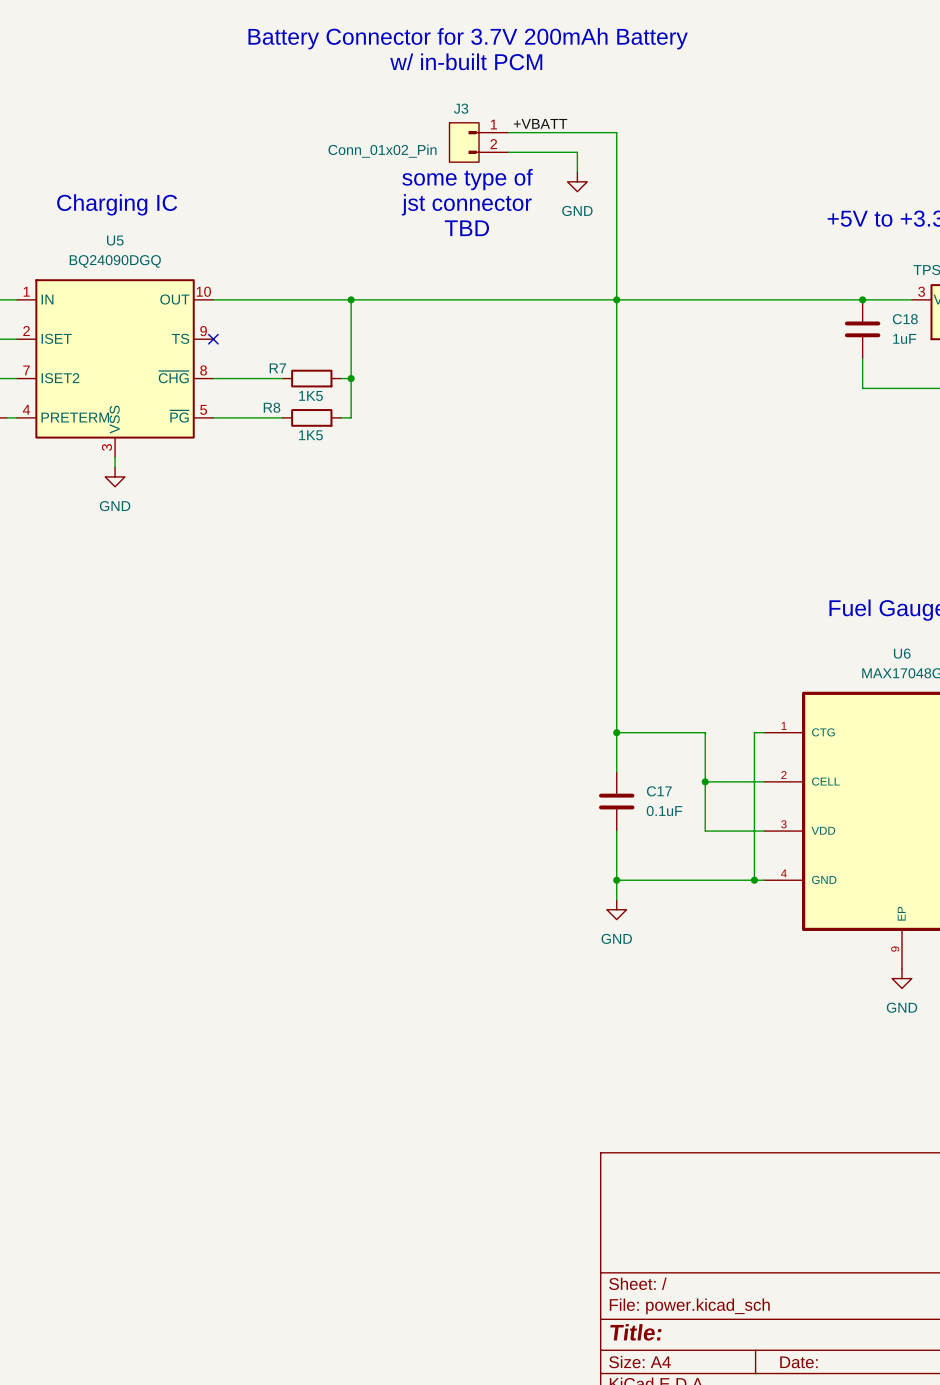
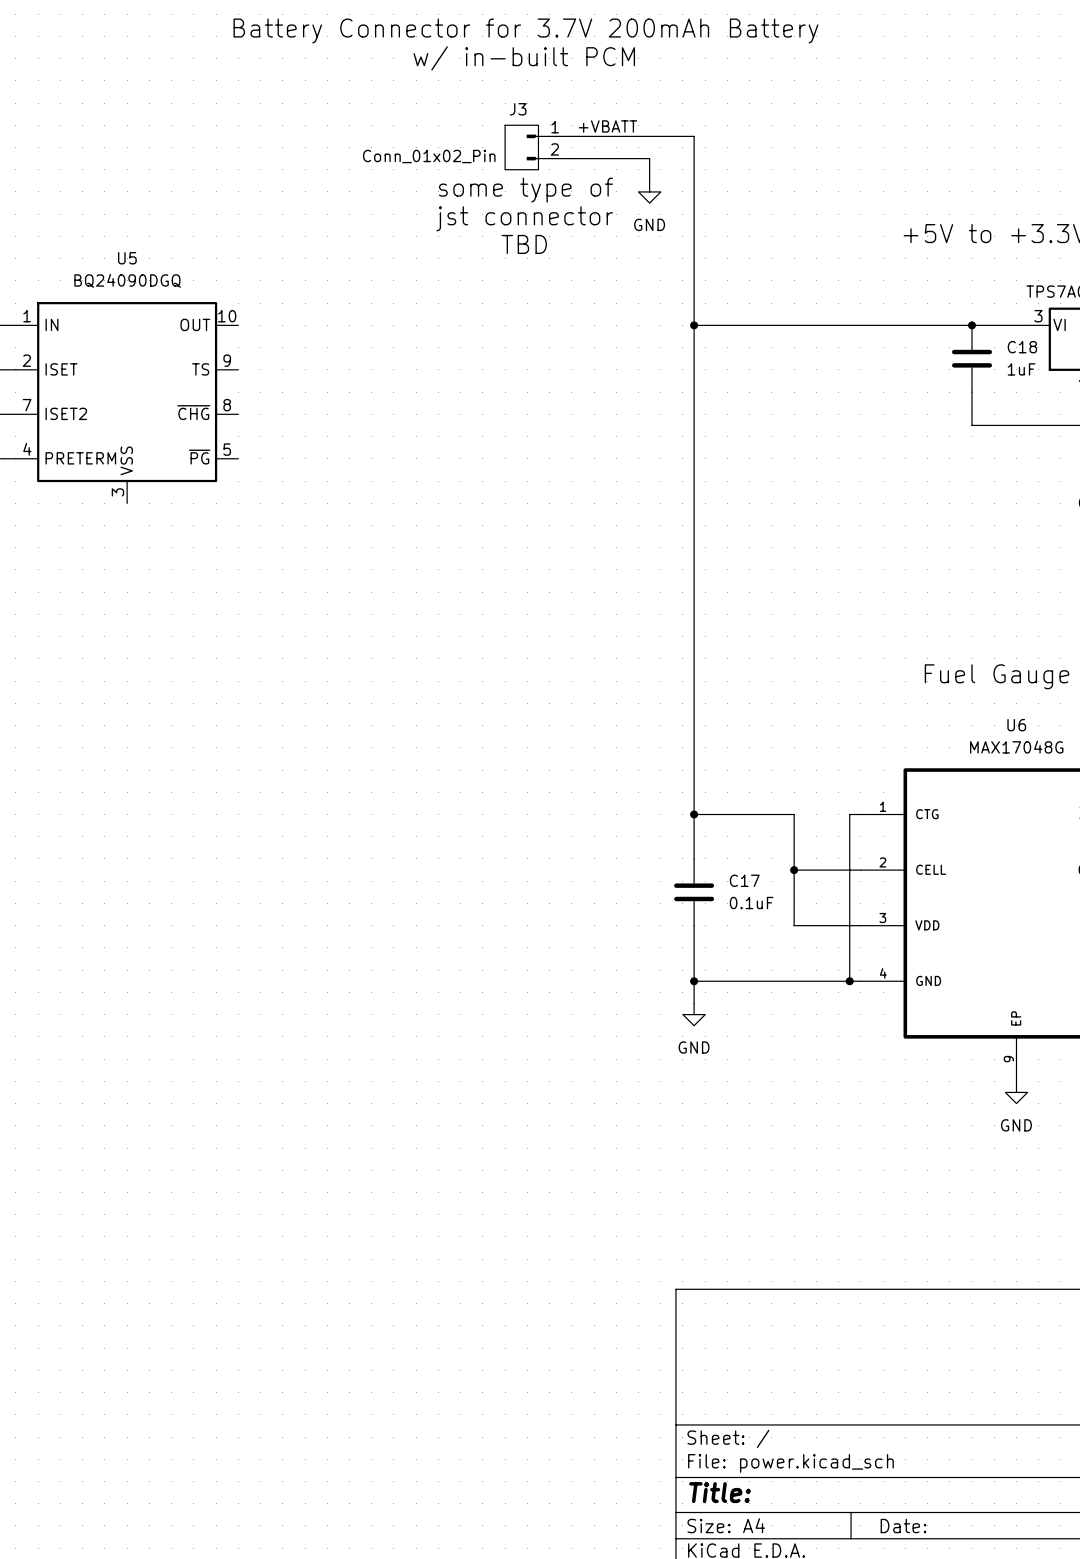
text: Charging IC (117, 204) -> none
wire: (213, 299) (616, 299) -> none
wire: (351, 299) (351, 417) (341, 417) -> none
junction: (351, 299) -> none
no-connect mark: (213, 339) -> none
wire: (213, 378) (282, 378) -> none
R7: 1K5 (311, 378) -> none
wire: (341, 378) (351, 378) -> none
junction: (351, 378) -> none
wire: (213, 417) (282, 417) -> none
R8: 1K5 (311, 417) -> none
wire: (115, 457) (115, 467) -> none
power symbol: GND (115, 476) -> none

